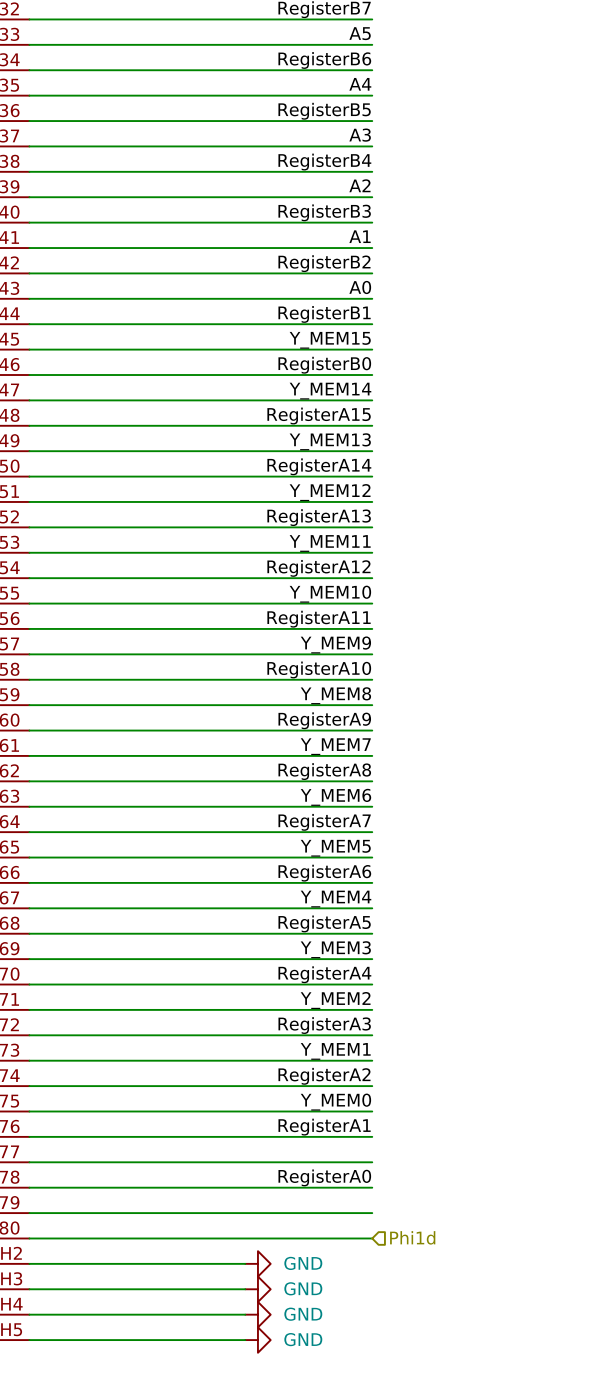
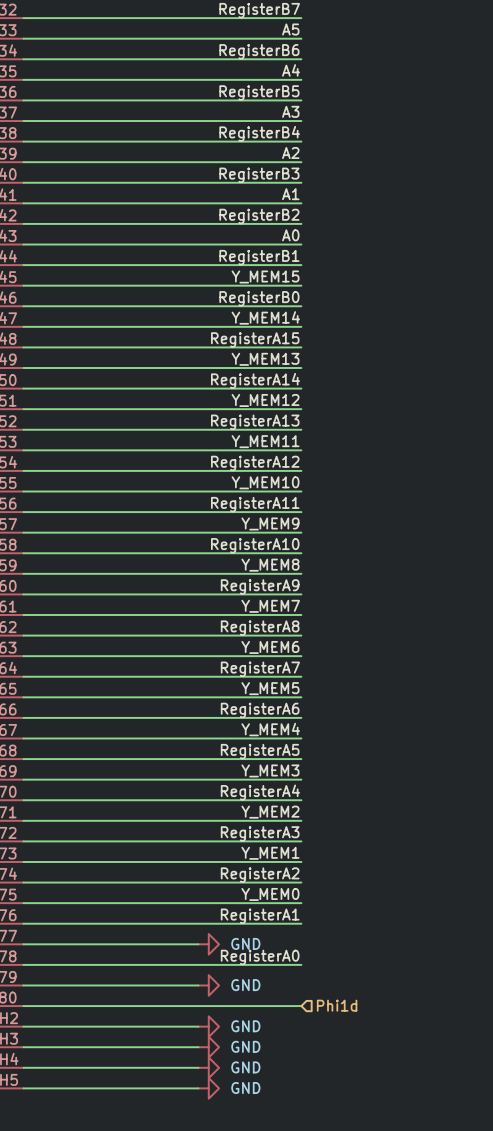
wire: (245, 1162) (372, 1162) -> none
power symbol: none -> GND (208, 944)
wire: (245, 1213) (372, 1213) -> none
power symbol: none -> GND (208, 985)

